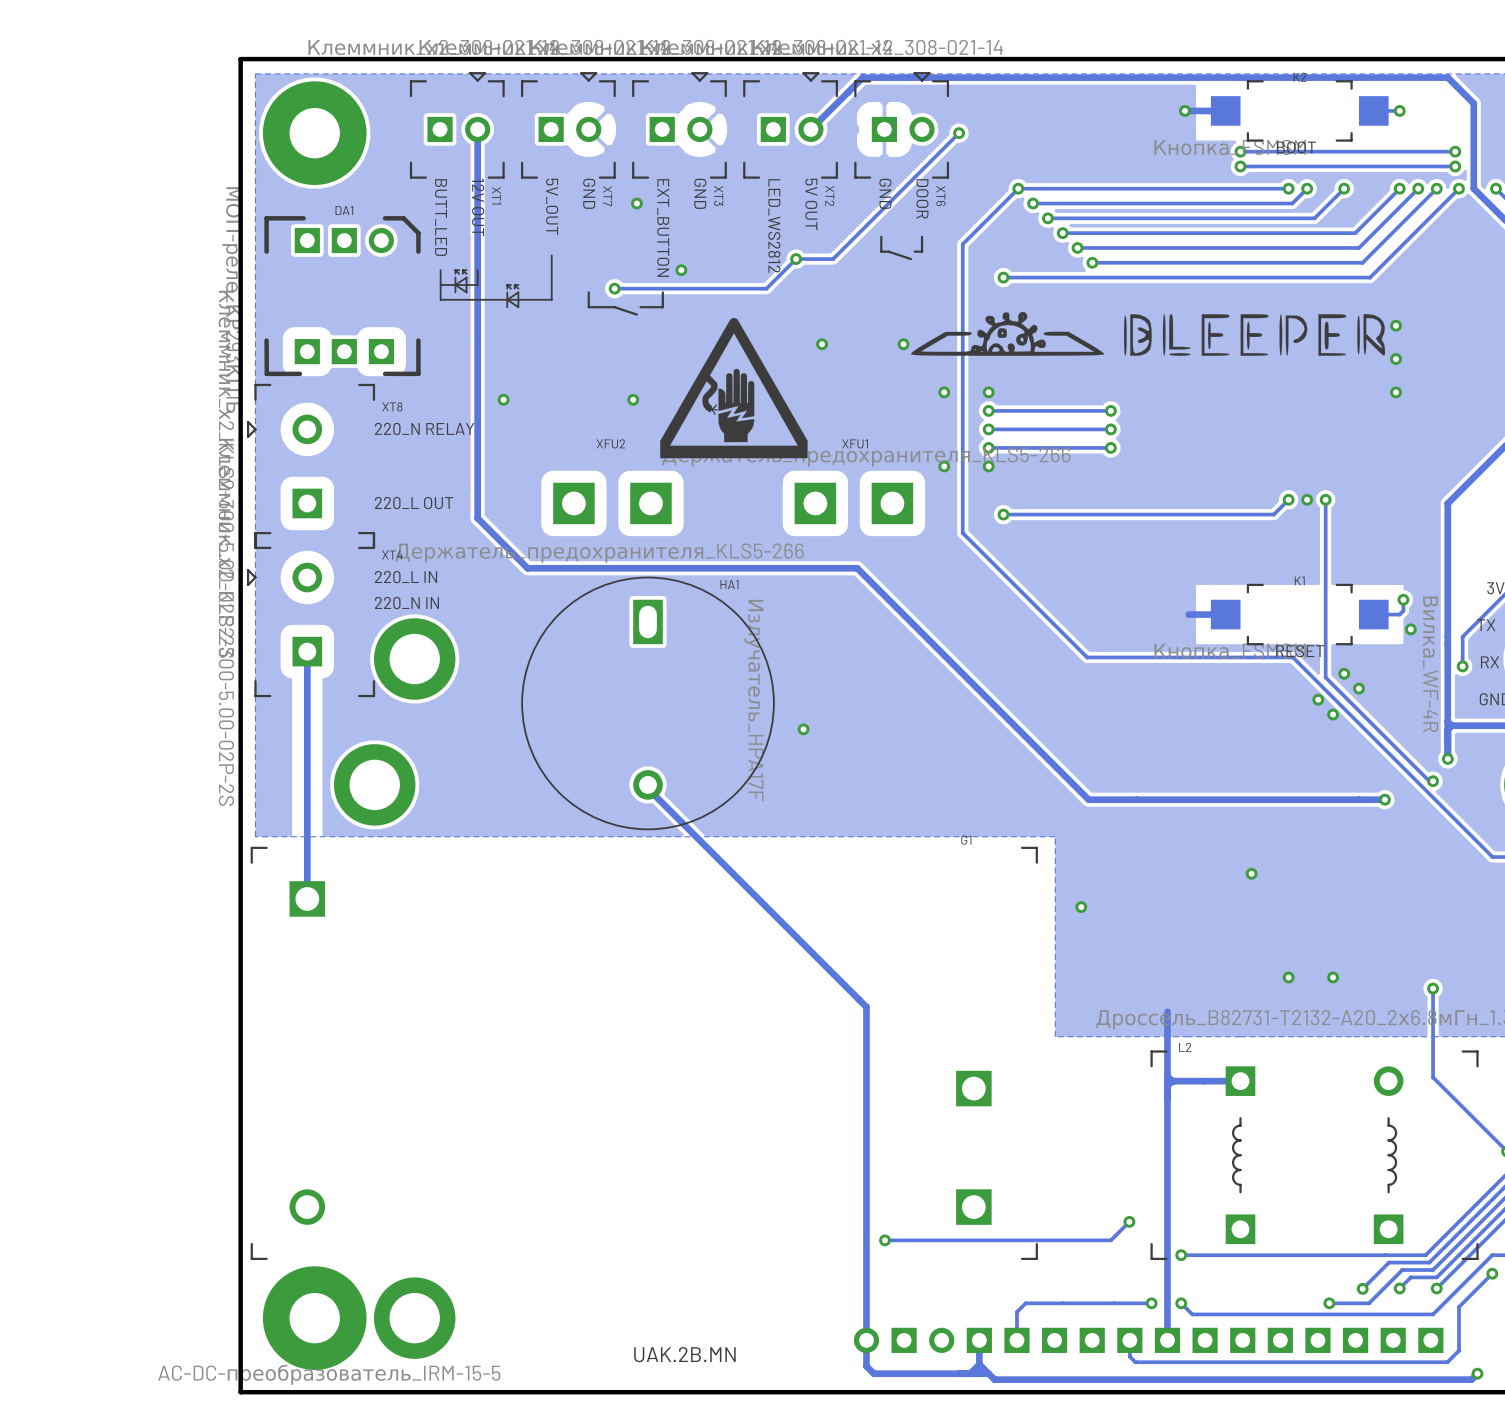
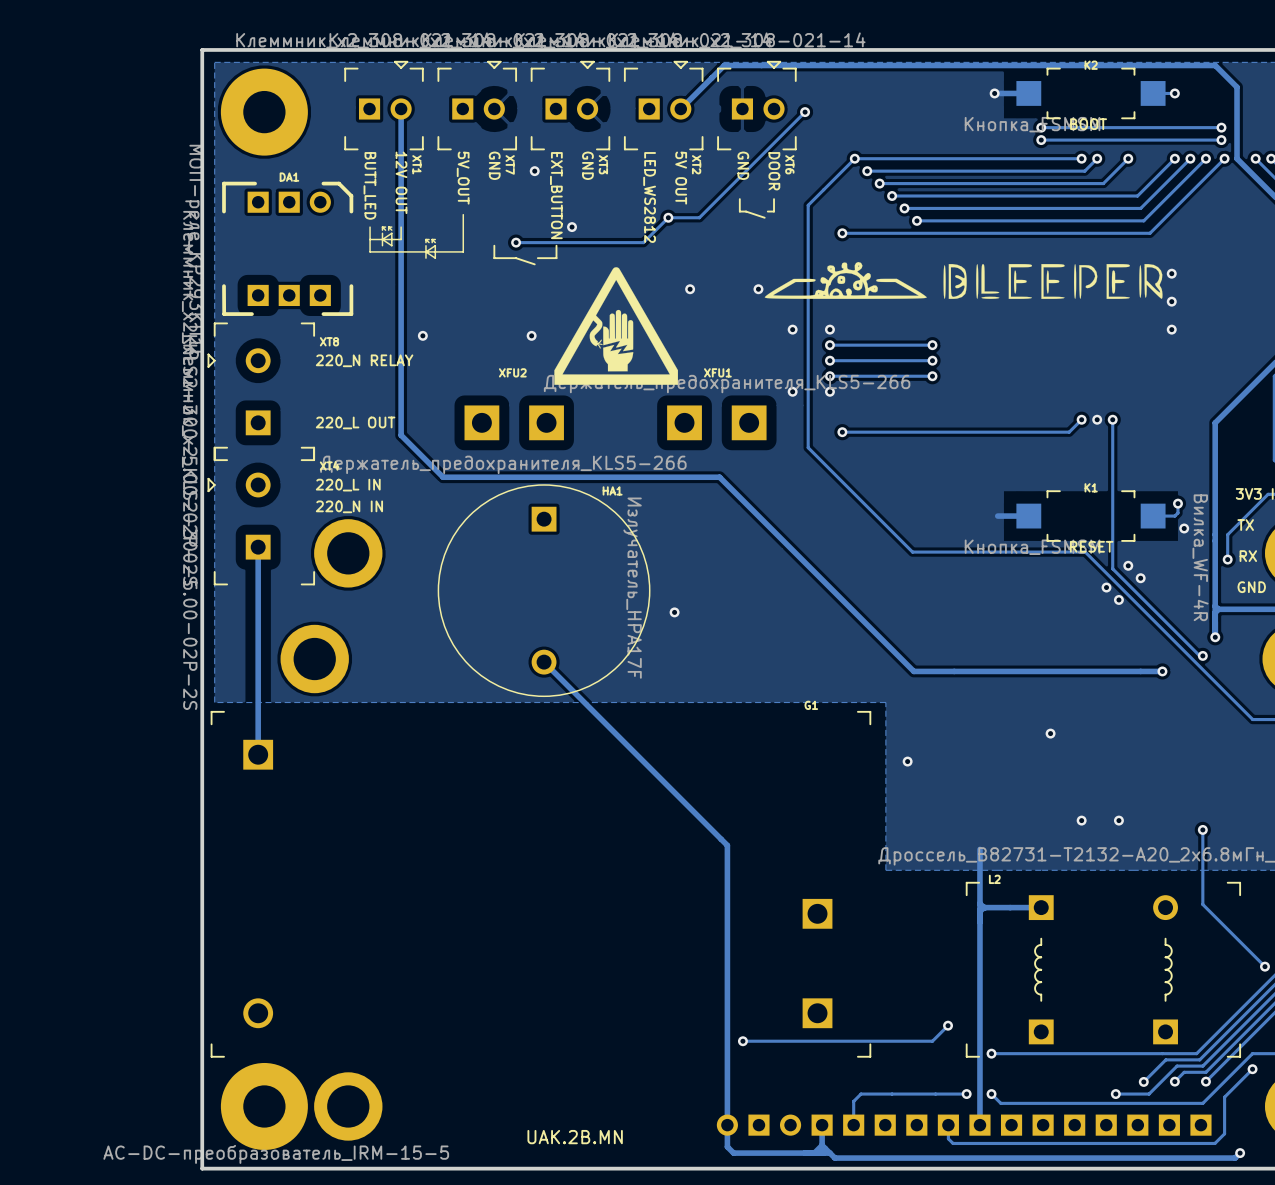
HA1 footprint: [521, 576, 775, 831] -> [437, 484, 651, 698]

